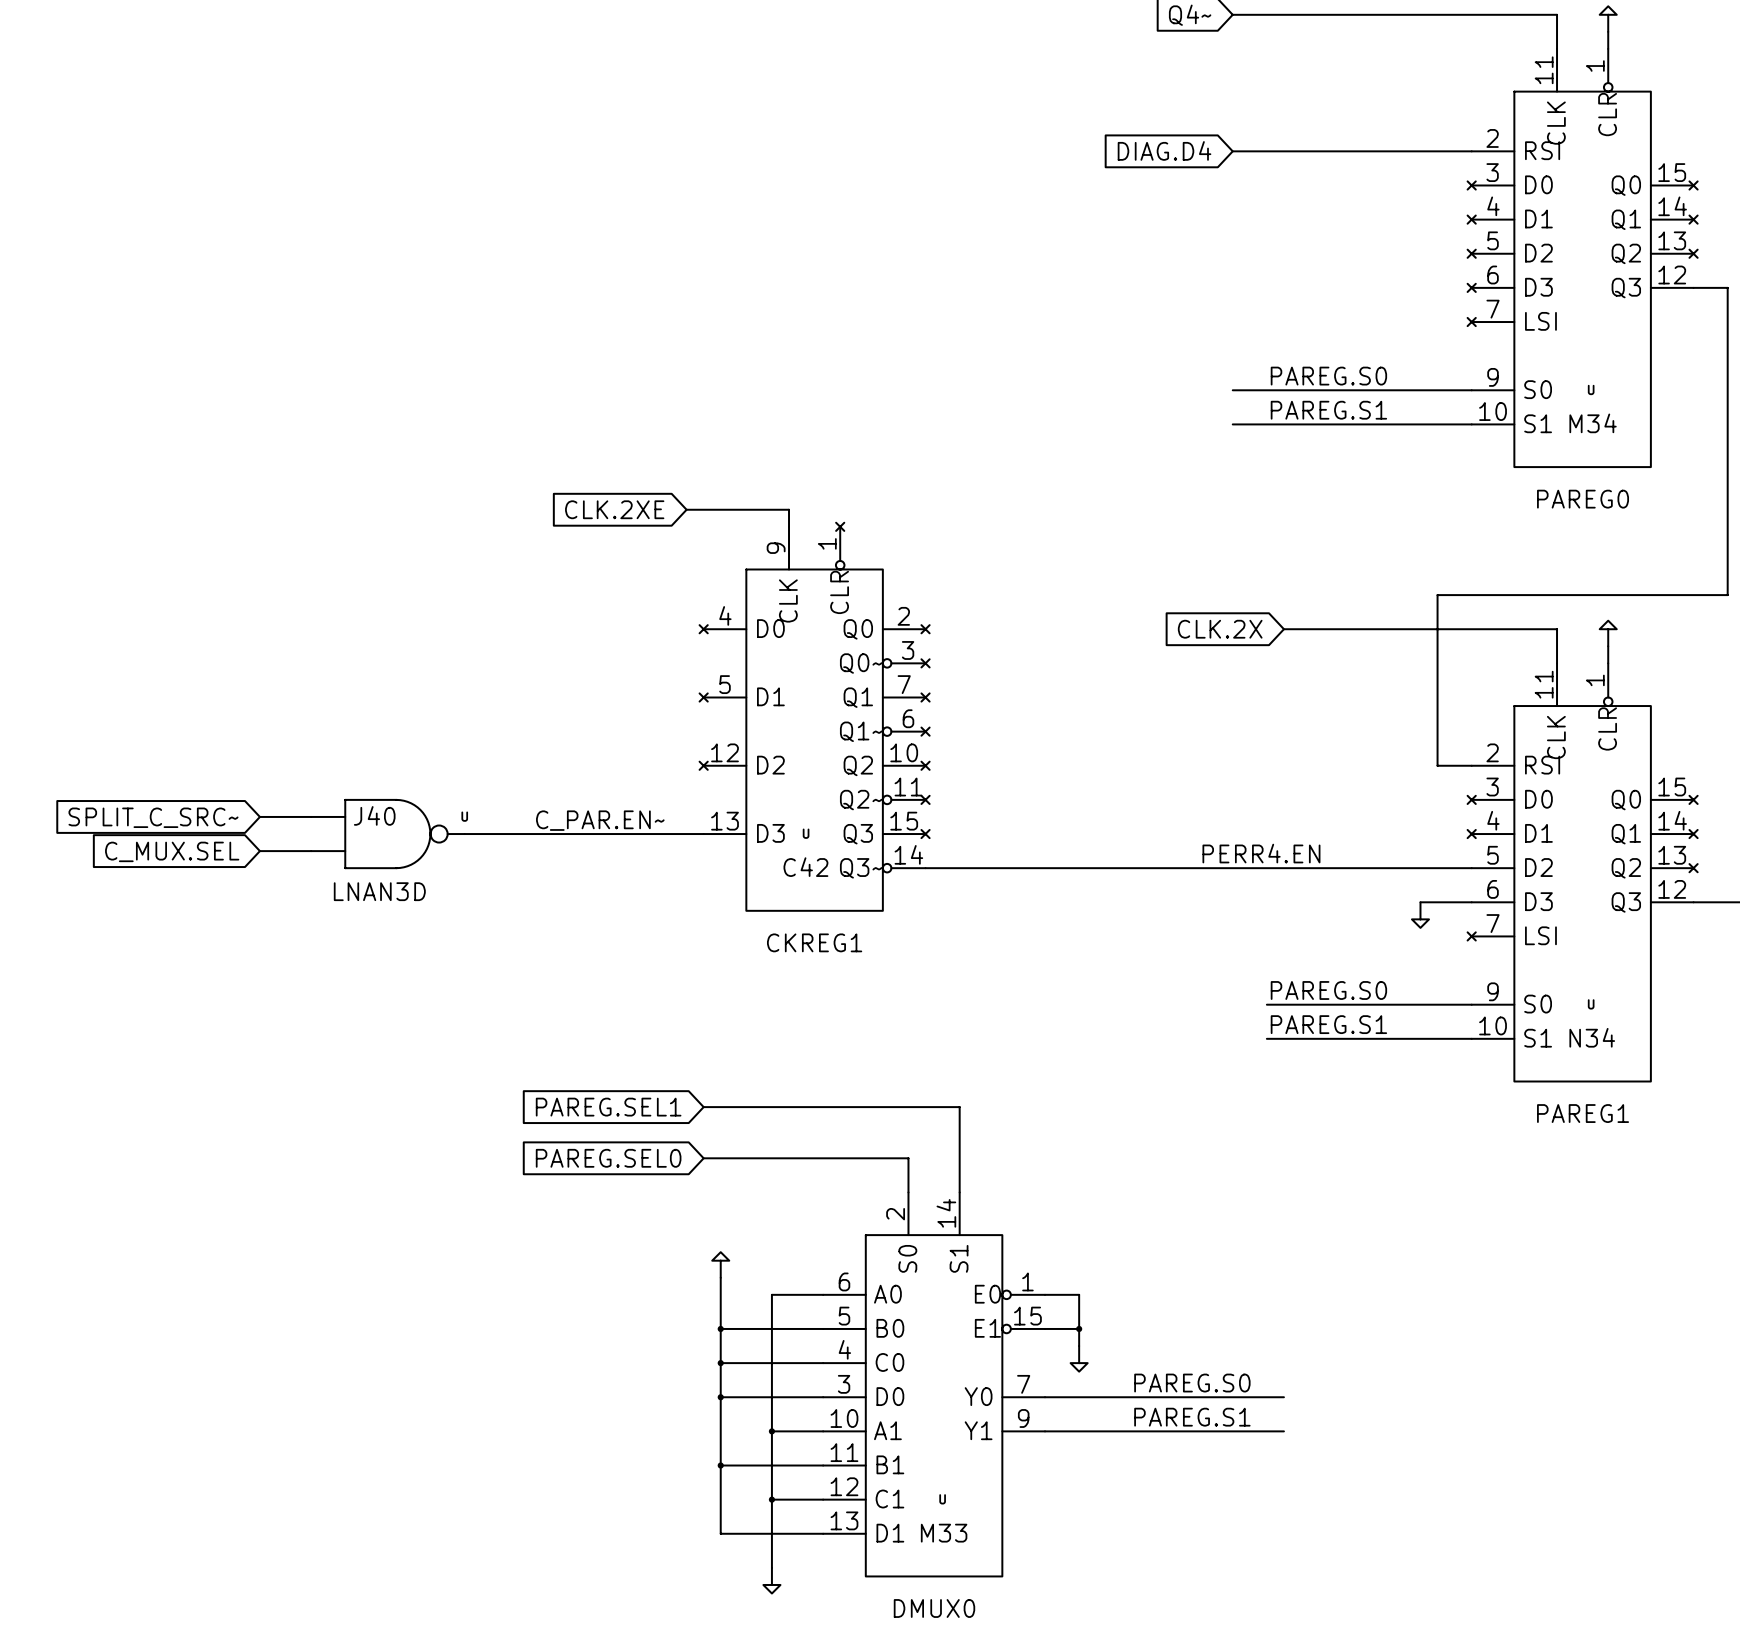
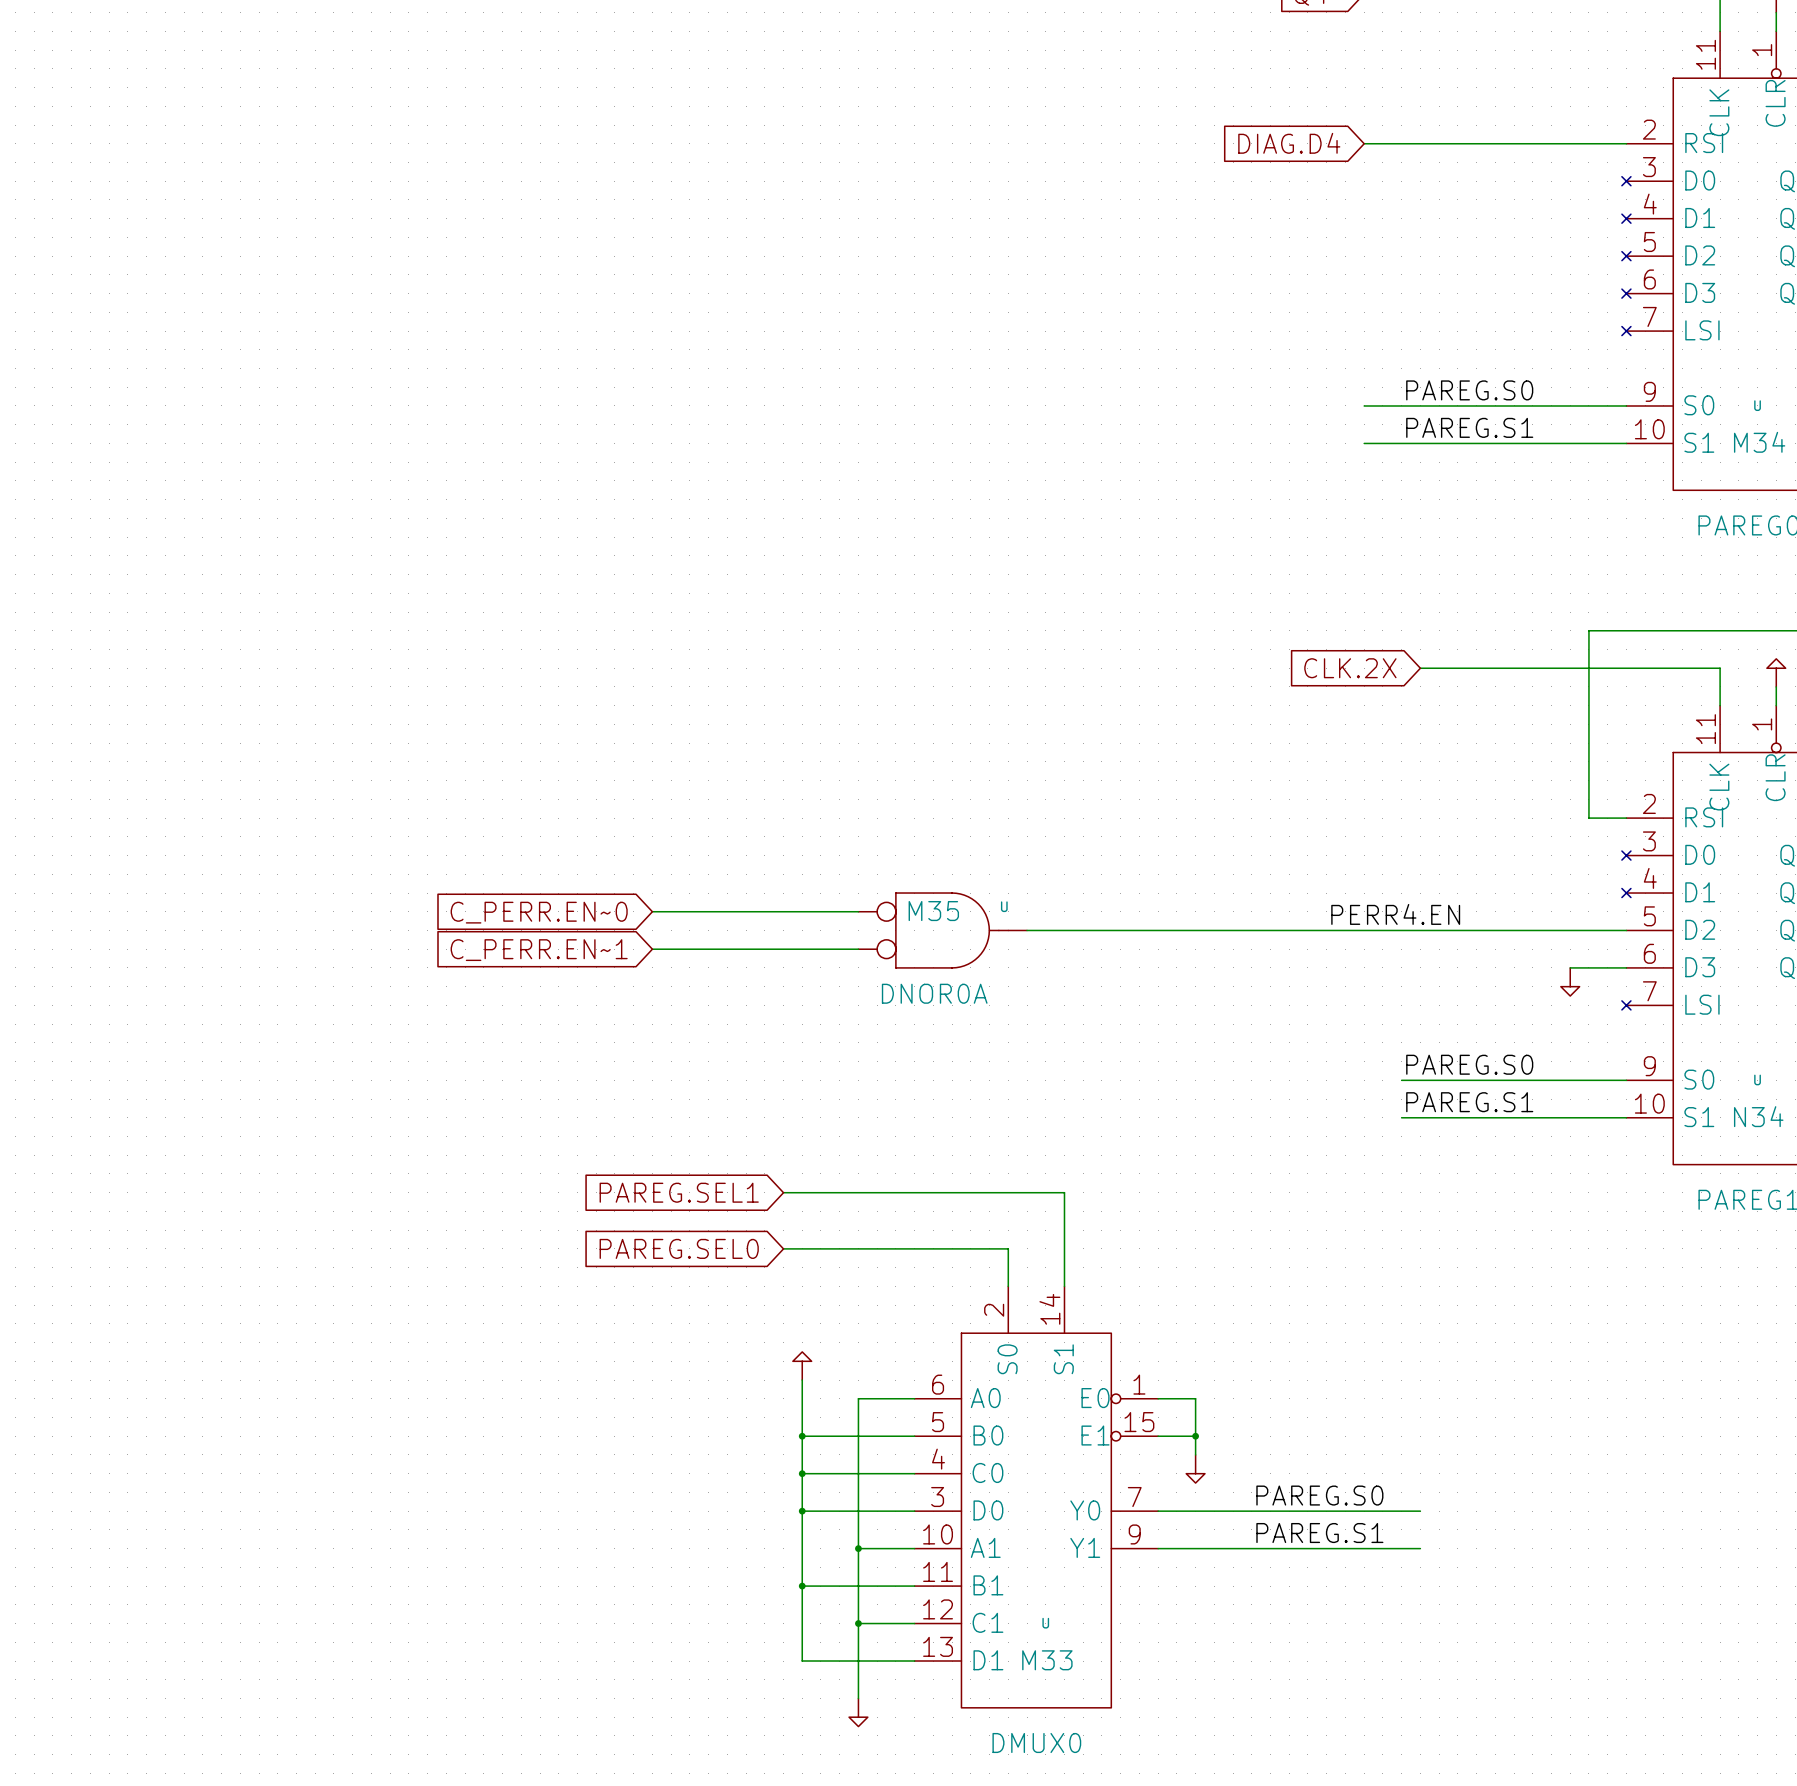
global label: CLK.2XE (614, 509) -> none
wire: (686, 509) (789, 509) (789, 526) -> none
no-connect mark: (840, 526) -> none
no-connect mark: (703, 629) -> none
no-connect mark: (925, 629) -> none
no-connect mark: (925, 663) -> none
no-connect mark: (703, 697) -> none
no-connect mark: (925, 697) -> none
U: (814, 718) -> none
no-connect mark: (925, 731) -> none
no-connect mark: (703, 765) -> none
no-connect mark: (925, 765) -> none
no-connect mark: (925, 799) -> none
wire: (259, 816) (311, 816) -> none
global label: SPLIT_C_SRC~ (153, 817) -> none
label: C_PAR.EN~ (600, 820) -> none
U: (387, 834) -> none
wire: (464, 834) (703, 834) -> none
no-connect mark: (925, 834) -> none
global label: C_MUX.SEL (172, 851) -> none
wire: (259, 851) (311, 851) -> none
global label: none -> C_PERR.EN~0 (539, 912)
wire: none -> (652, 911) (858, 911)
U: none -> (942, 930)
wire: none -> (652, 949) (858, 949)
global label: none -> C_PERR.EN~1 (539, 950)

